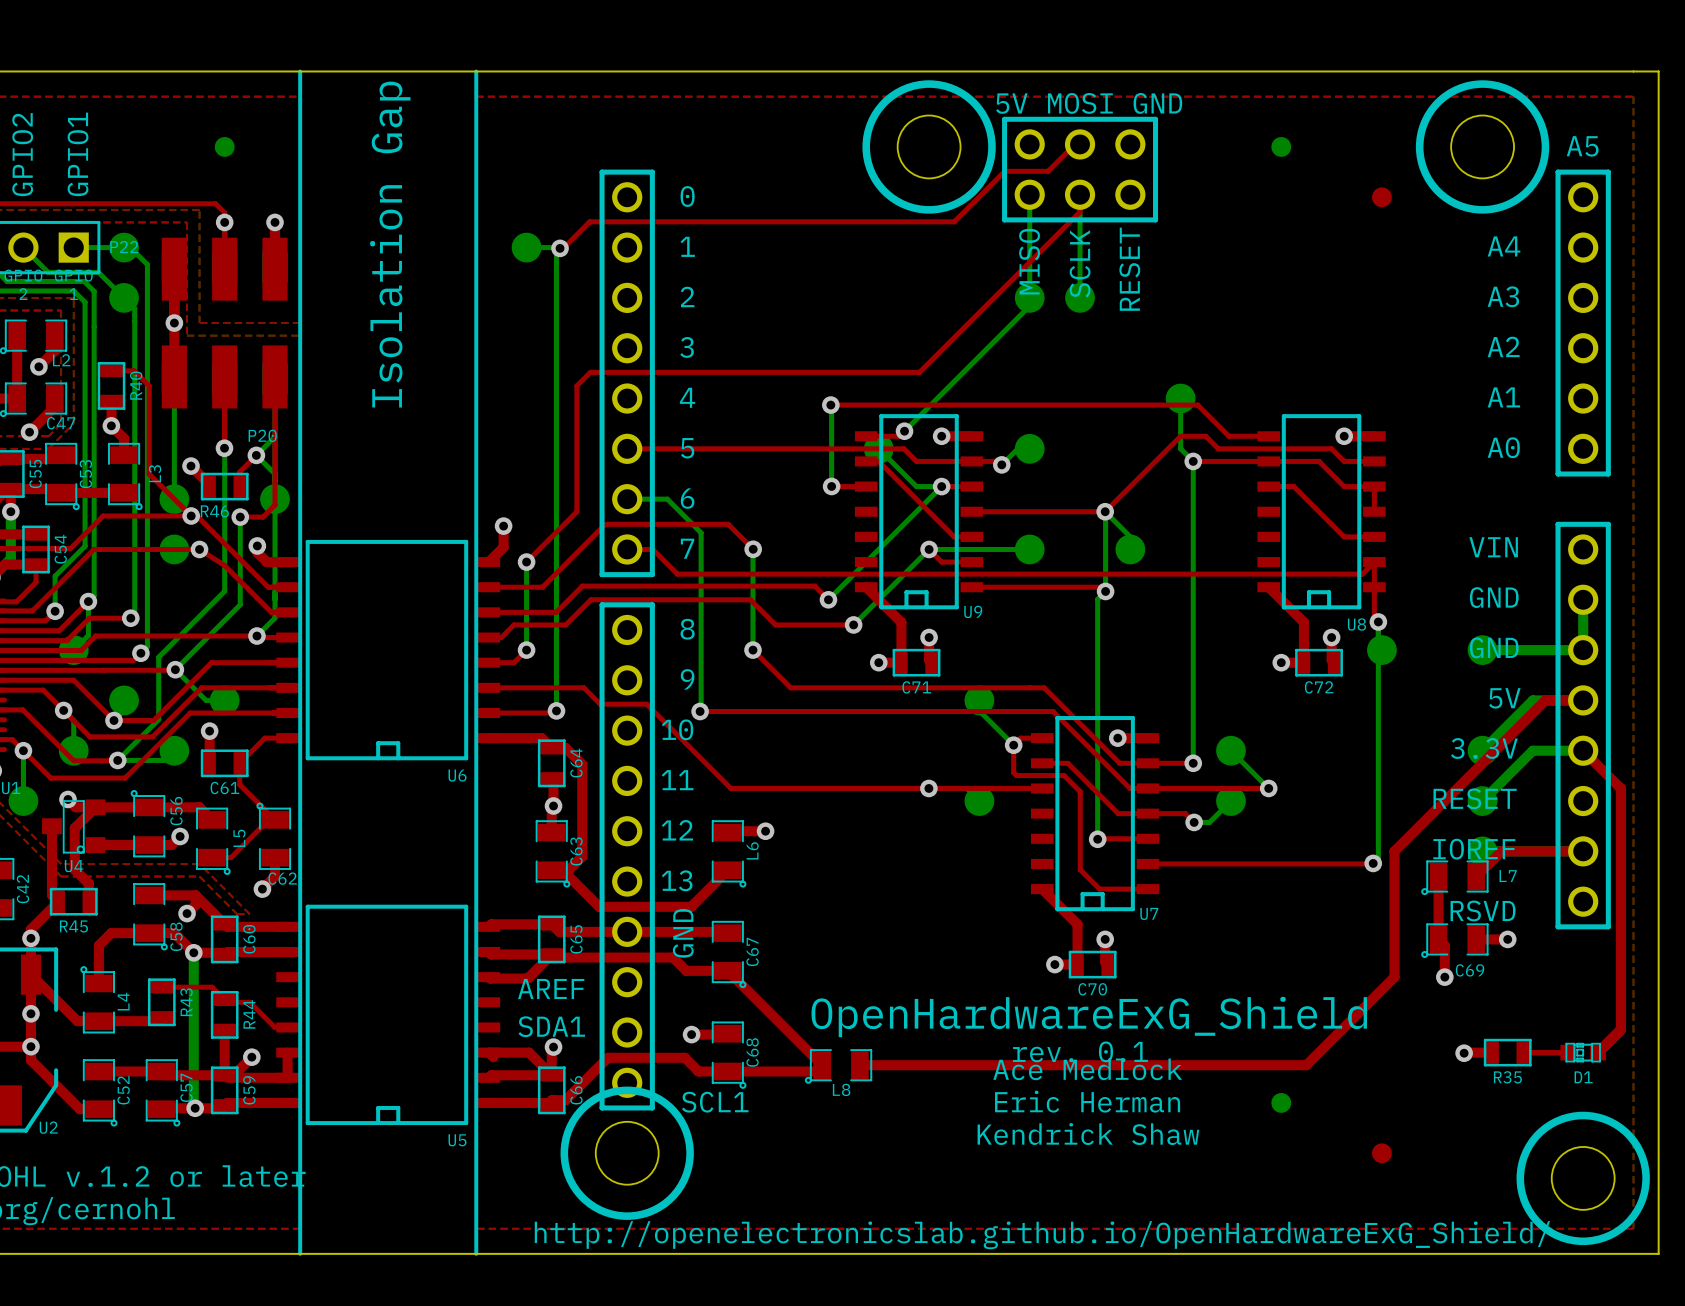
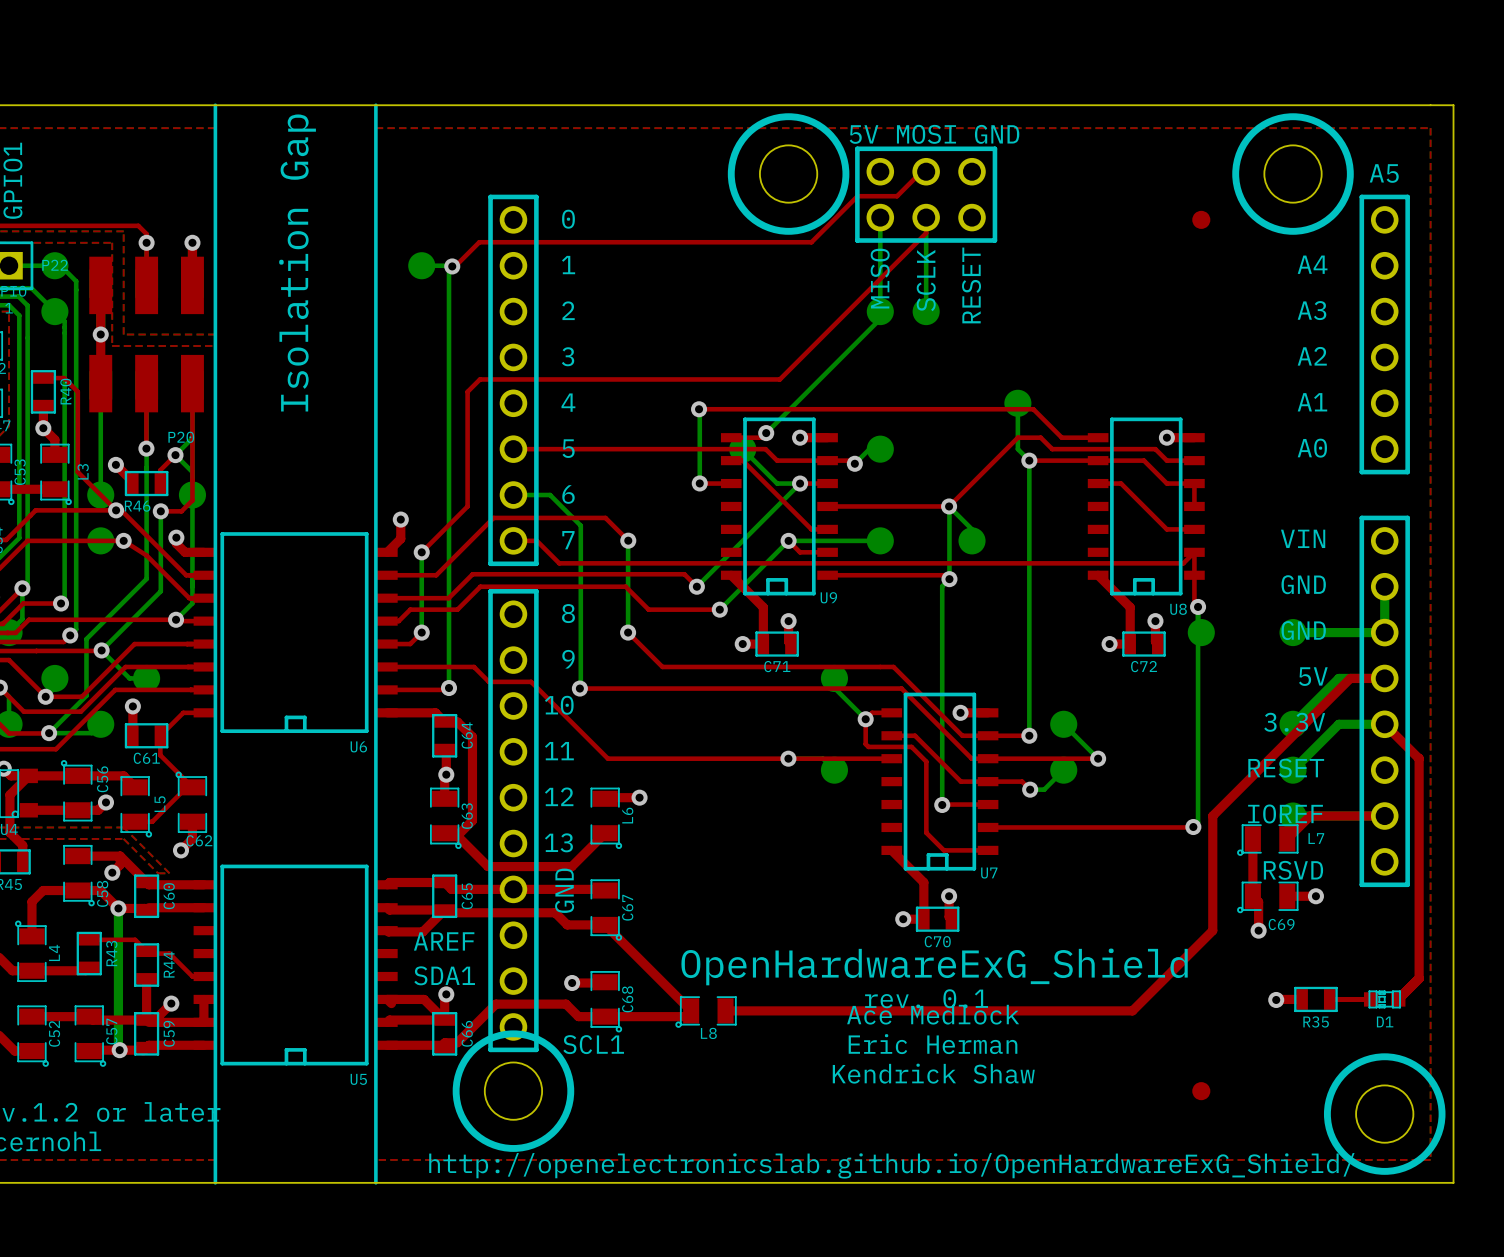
part: (224, 146) -> none
part: (1281, 146) -> none
part: (1281, 1102) -> none

